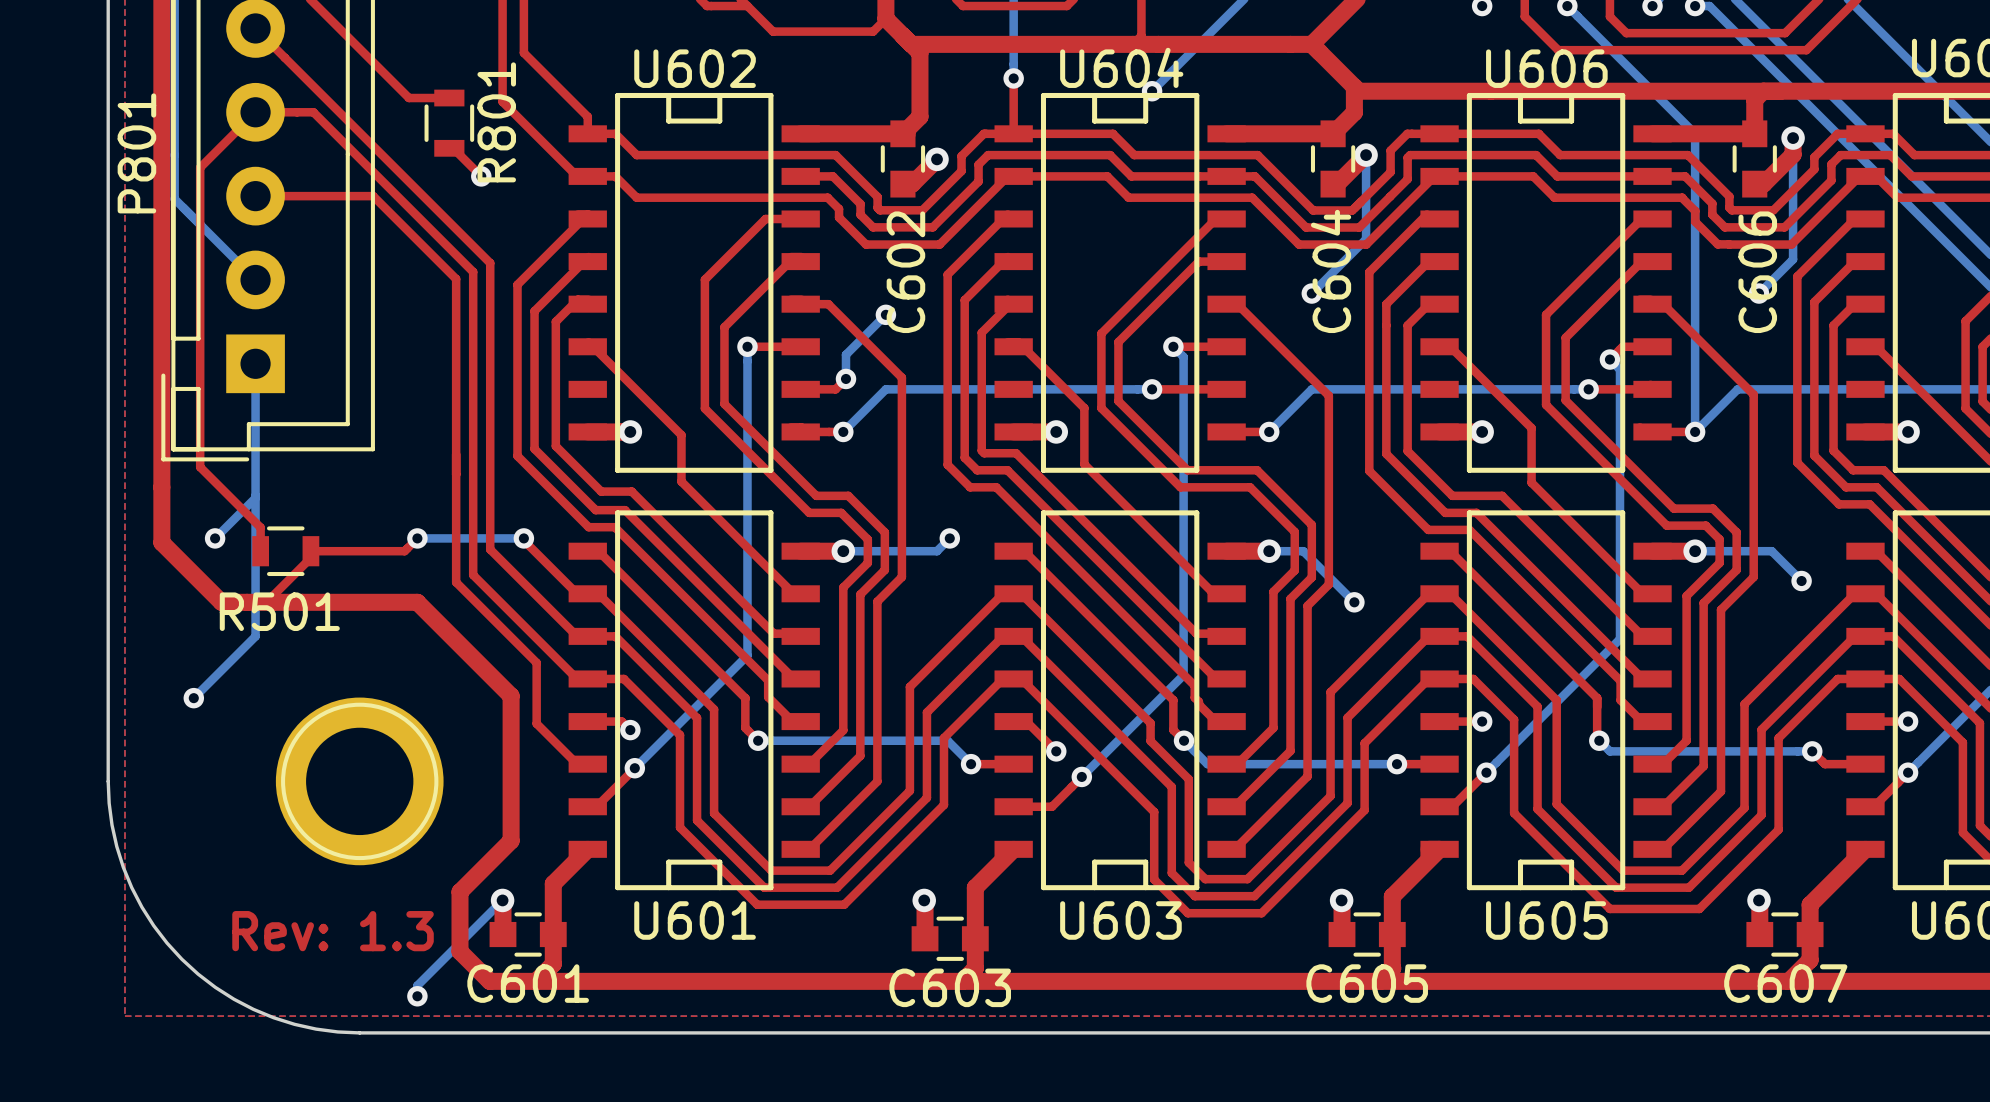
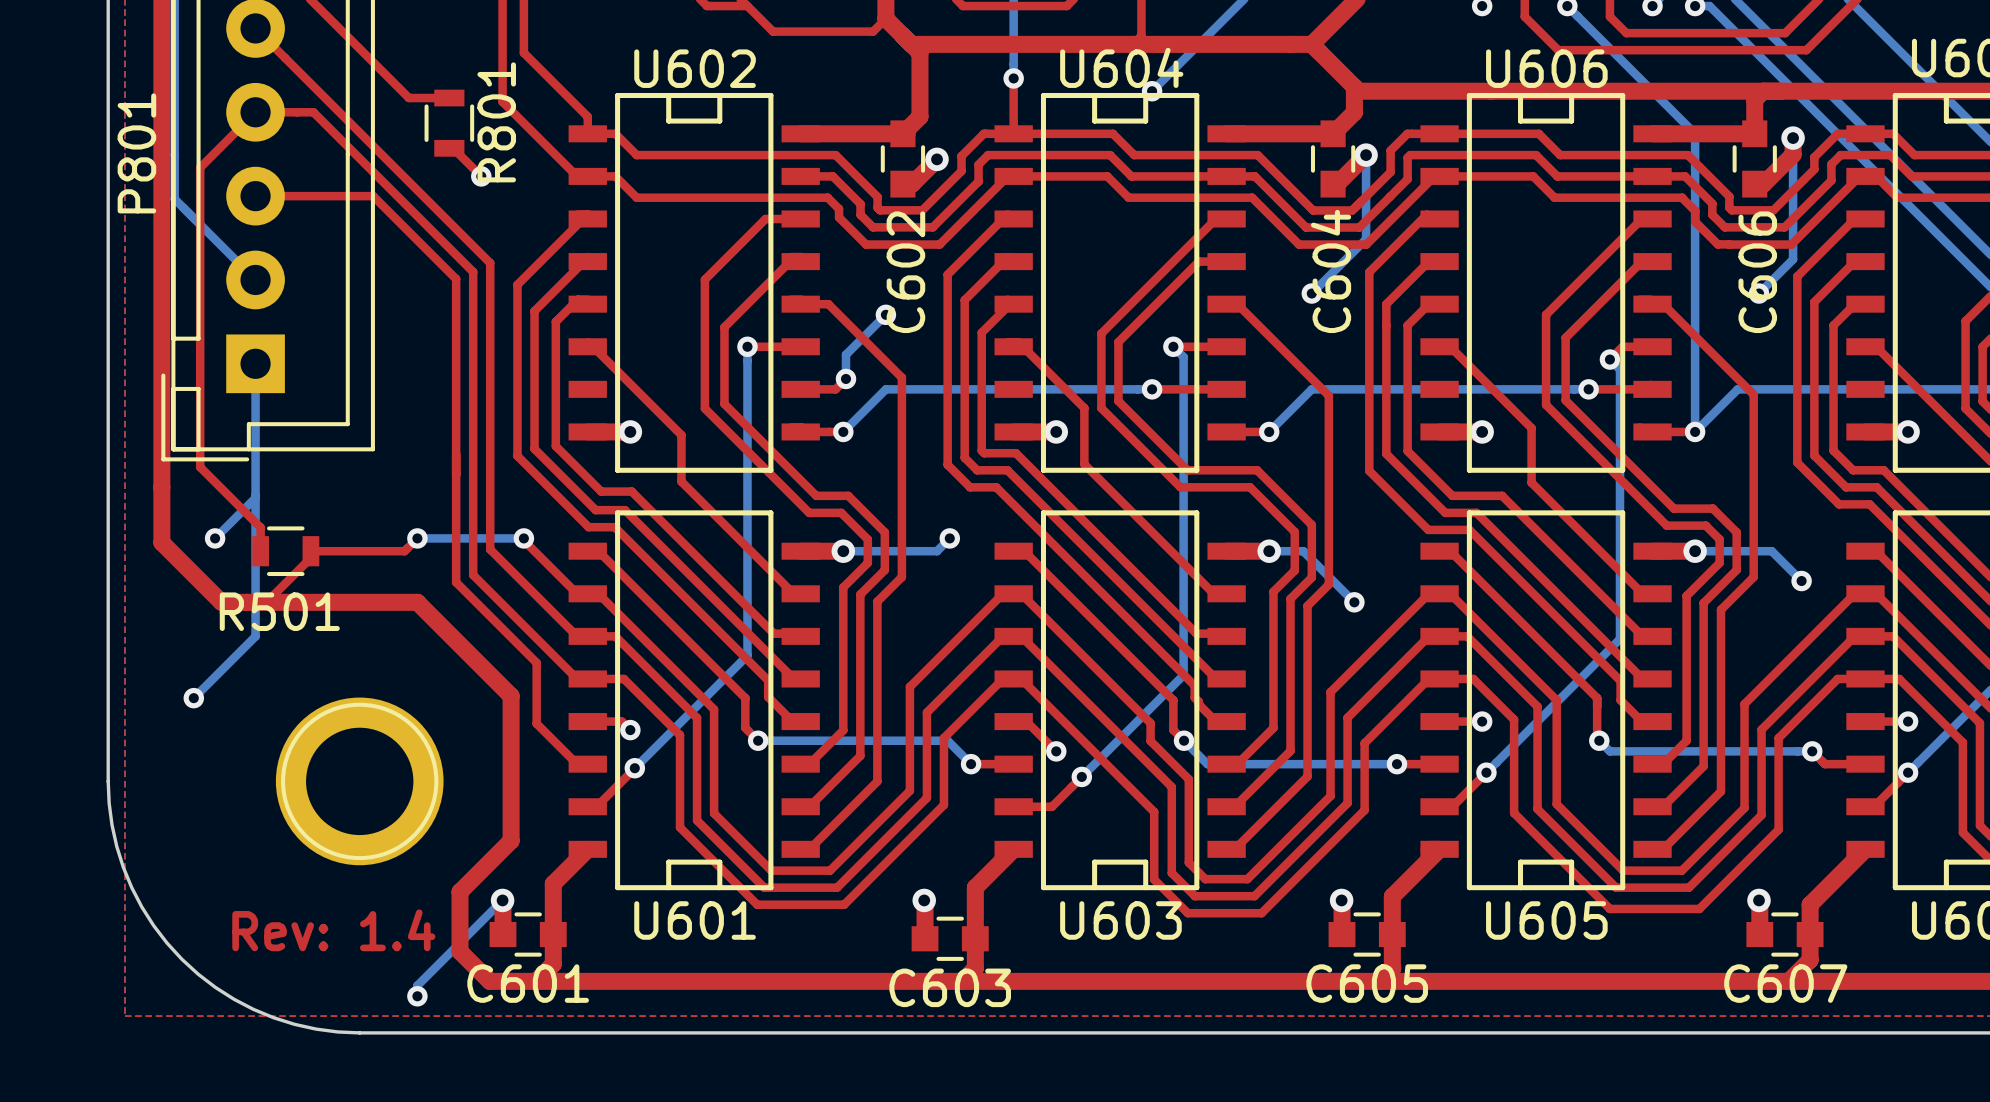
text: Rev: 1.3 (333, 931) -> Rev: 1.4 (333, 930)

